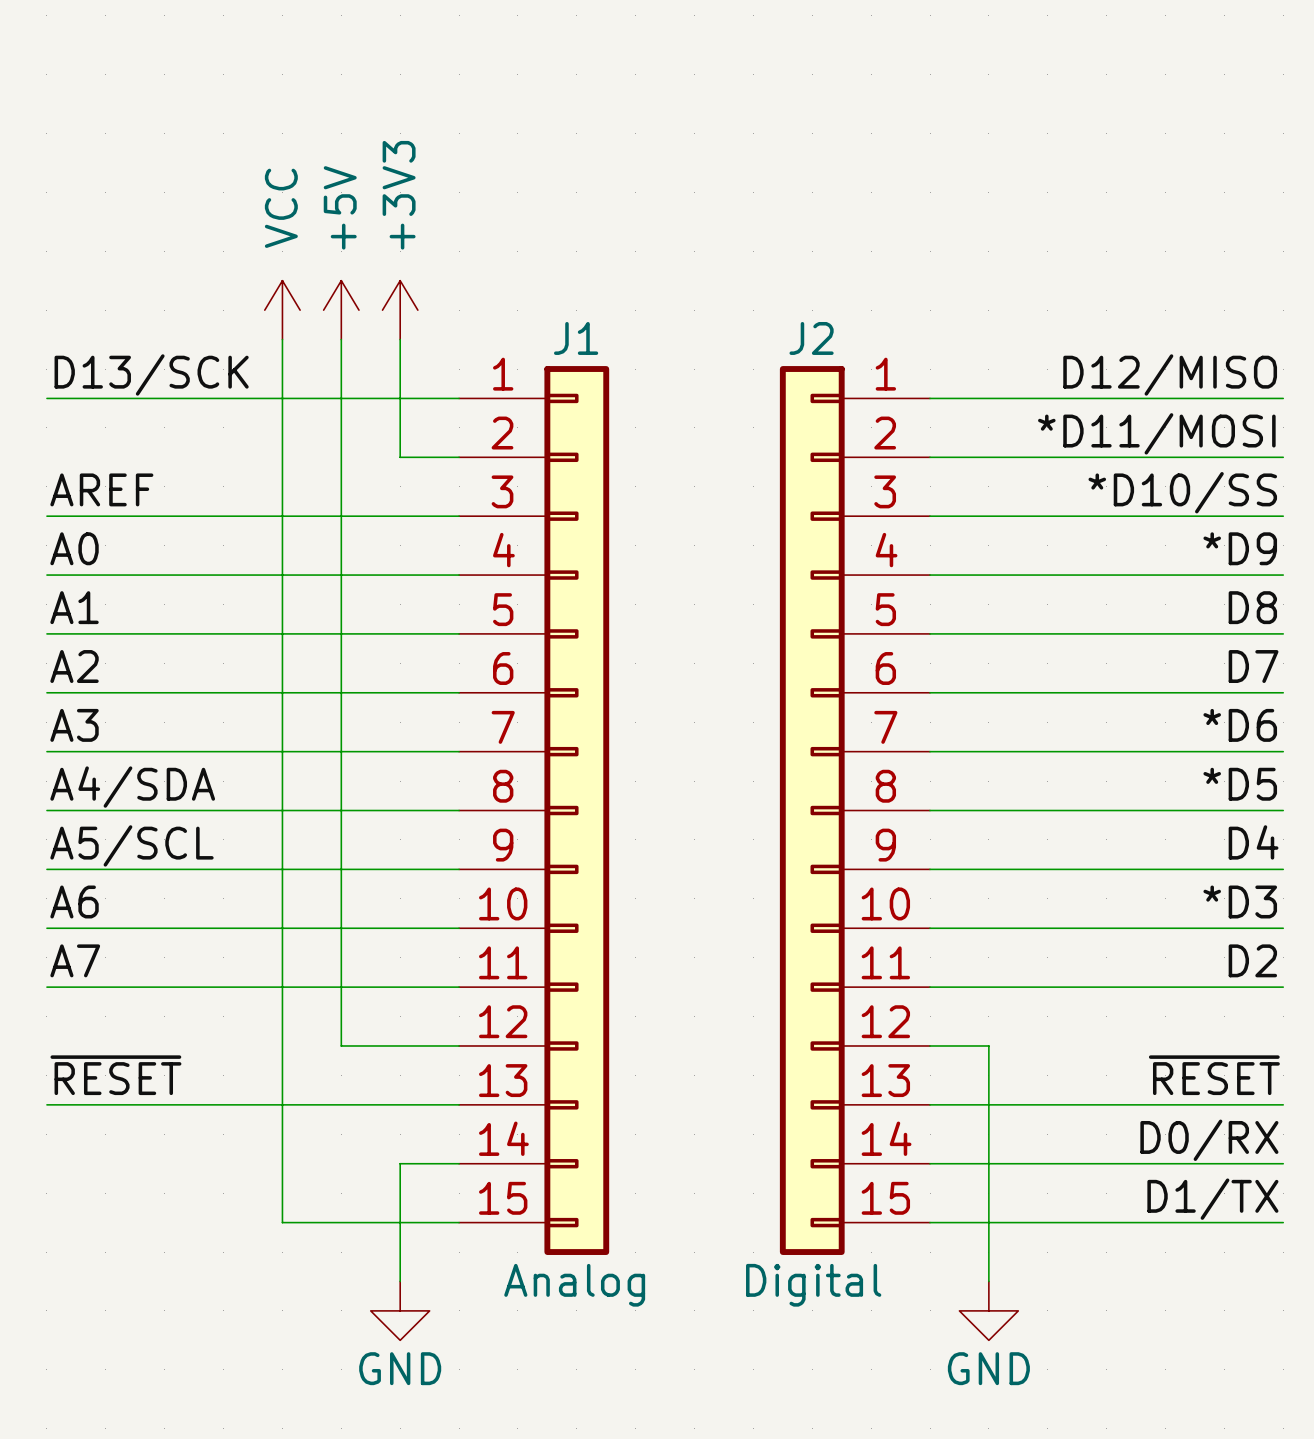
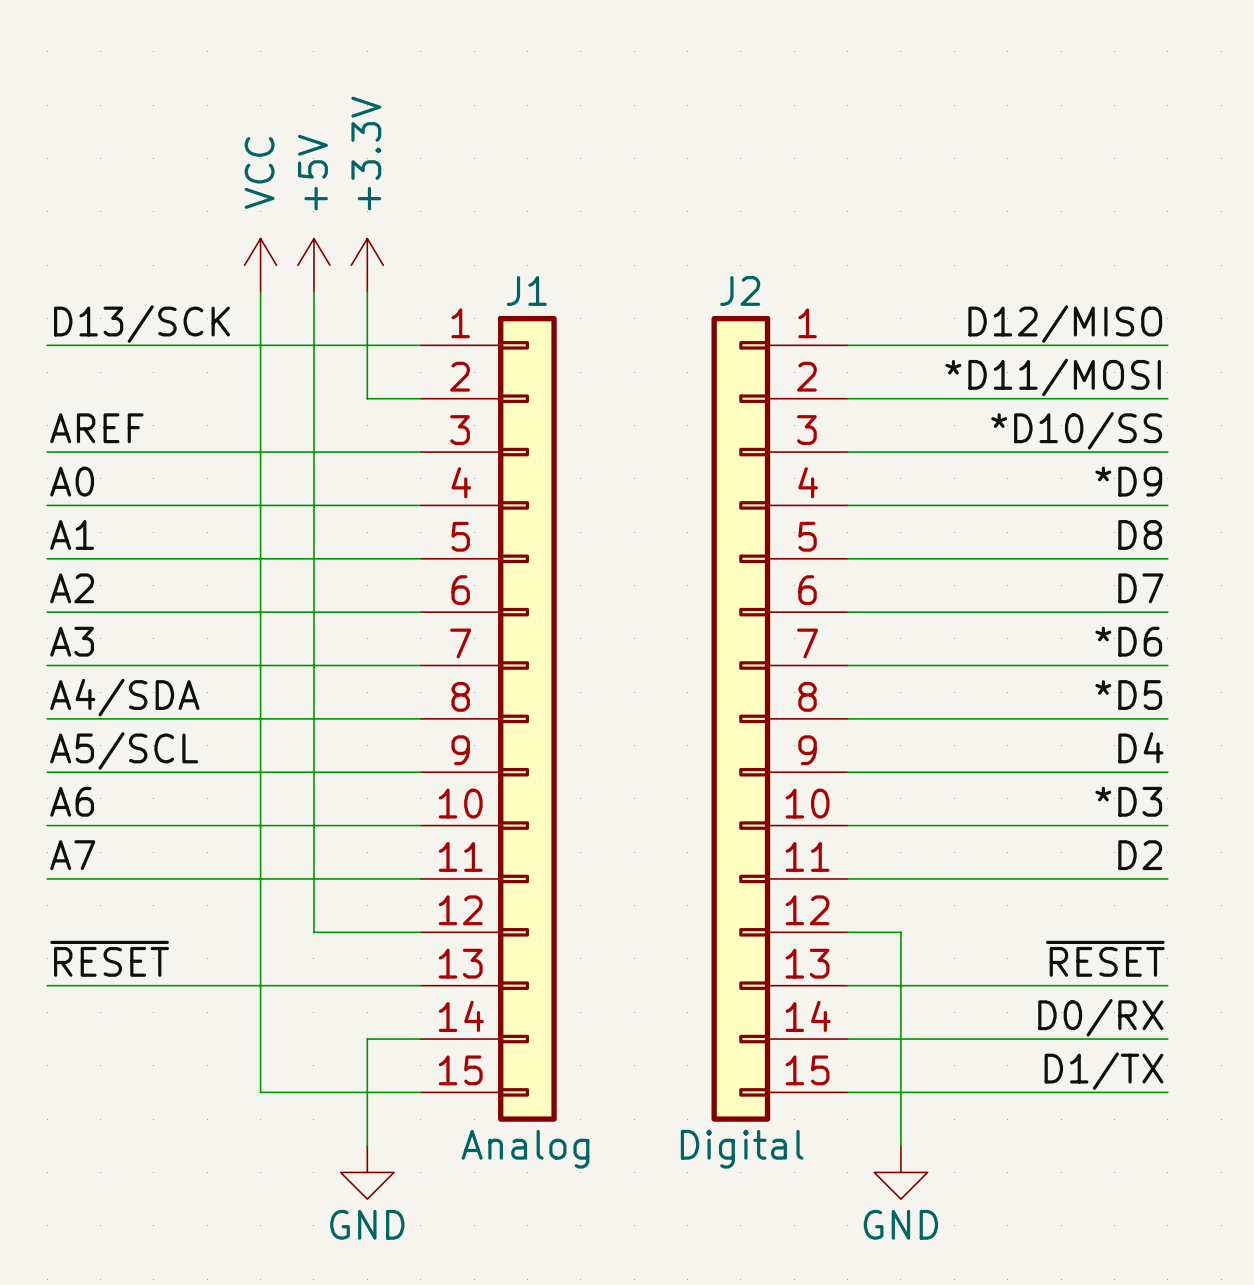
power symbol: +3V3 (400, 310) -> +3.3V (367, 265)

